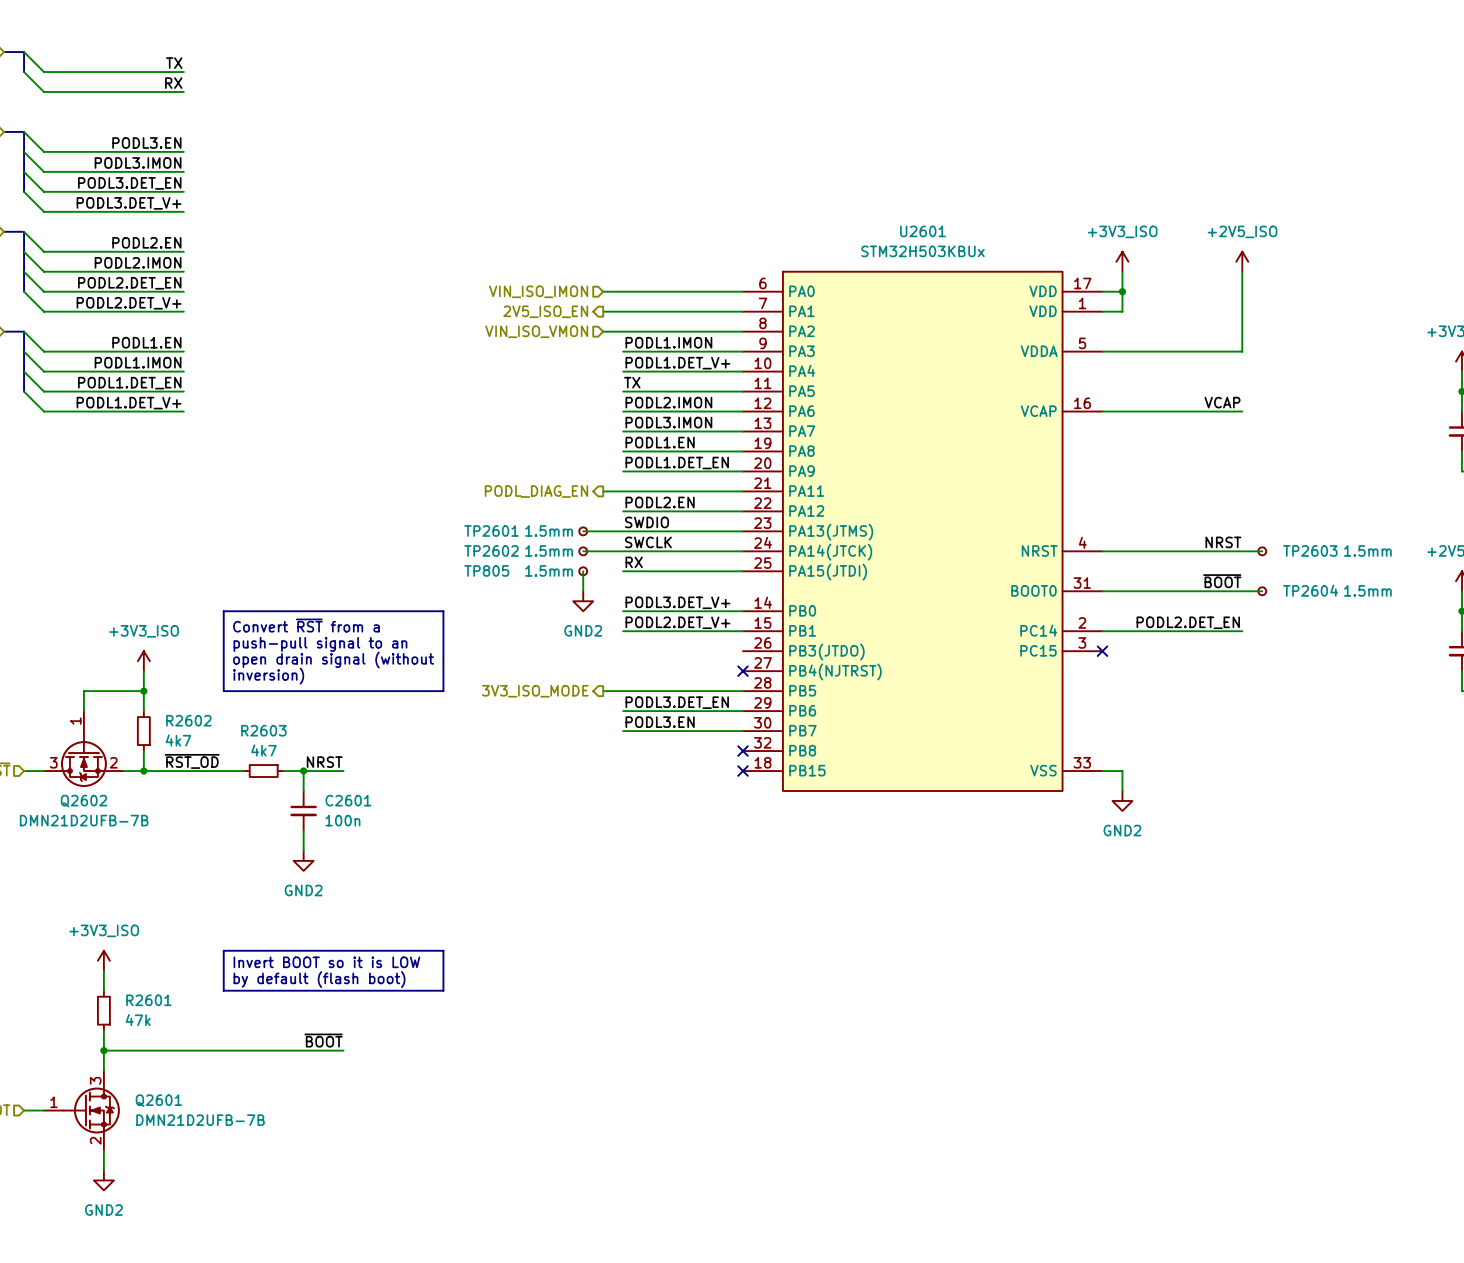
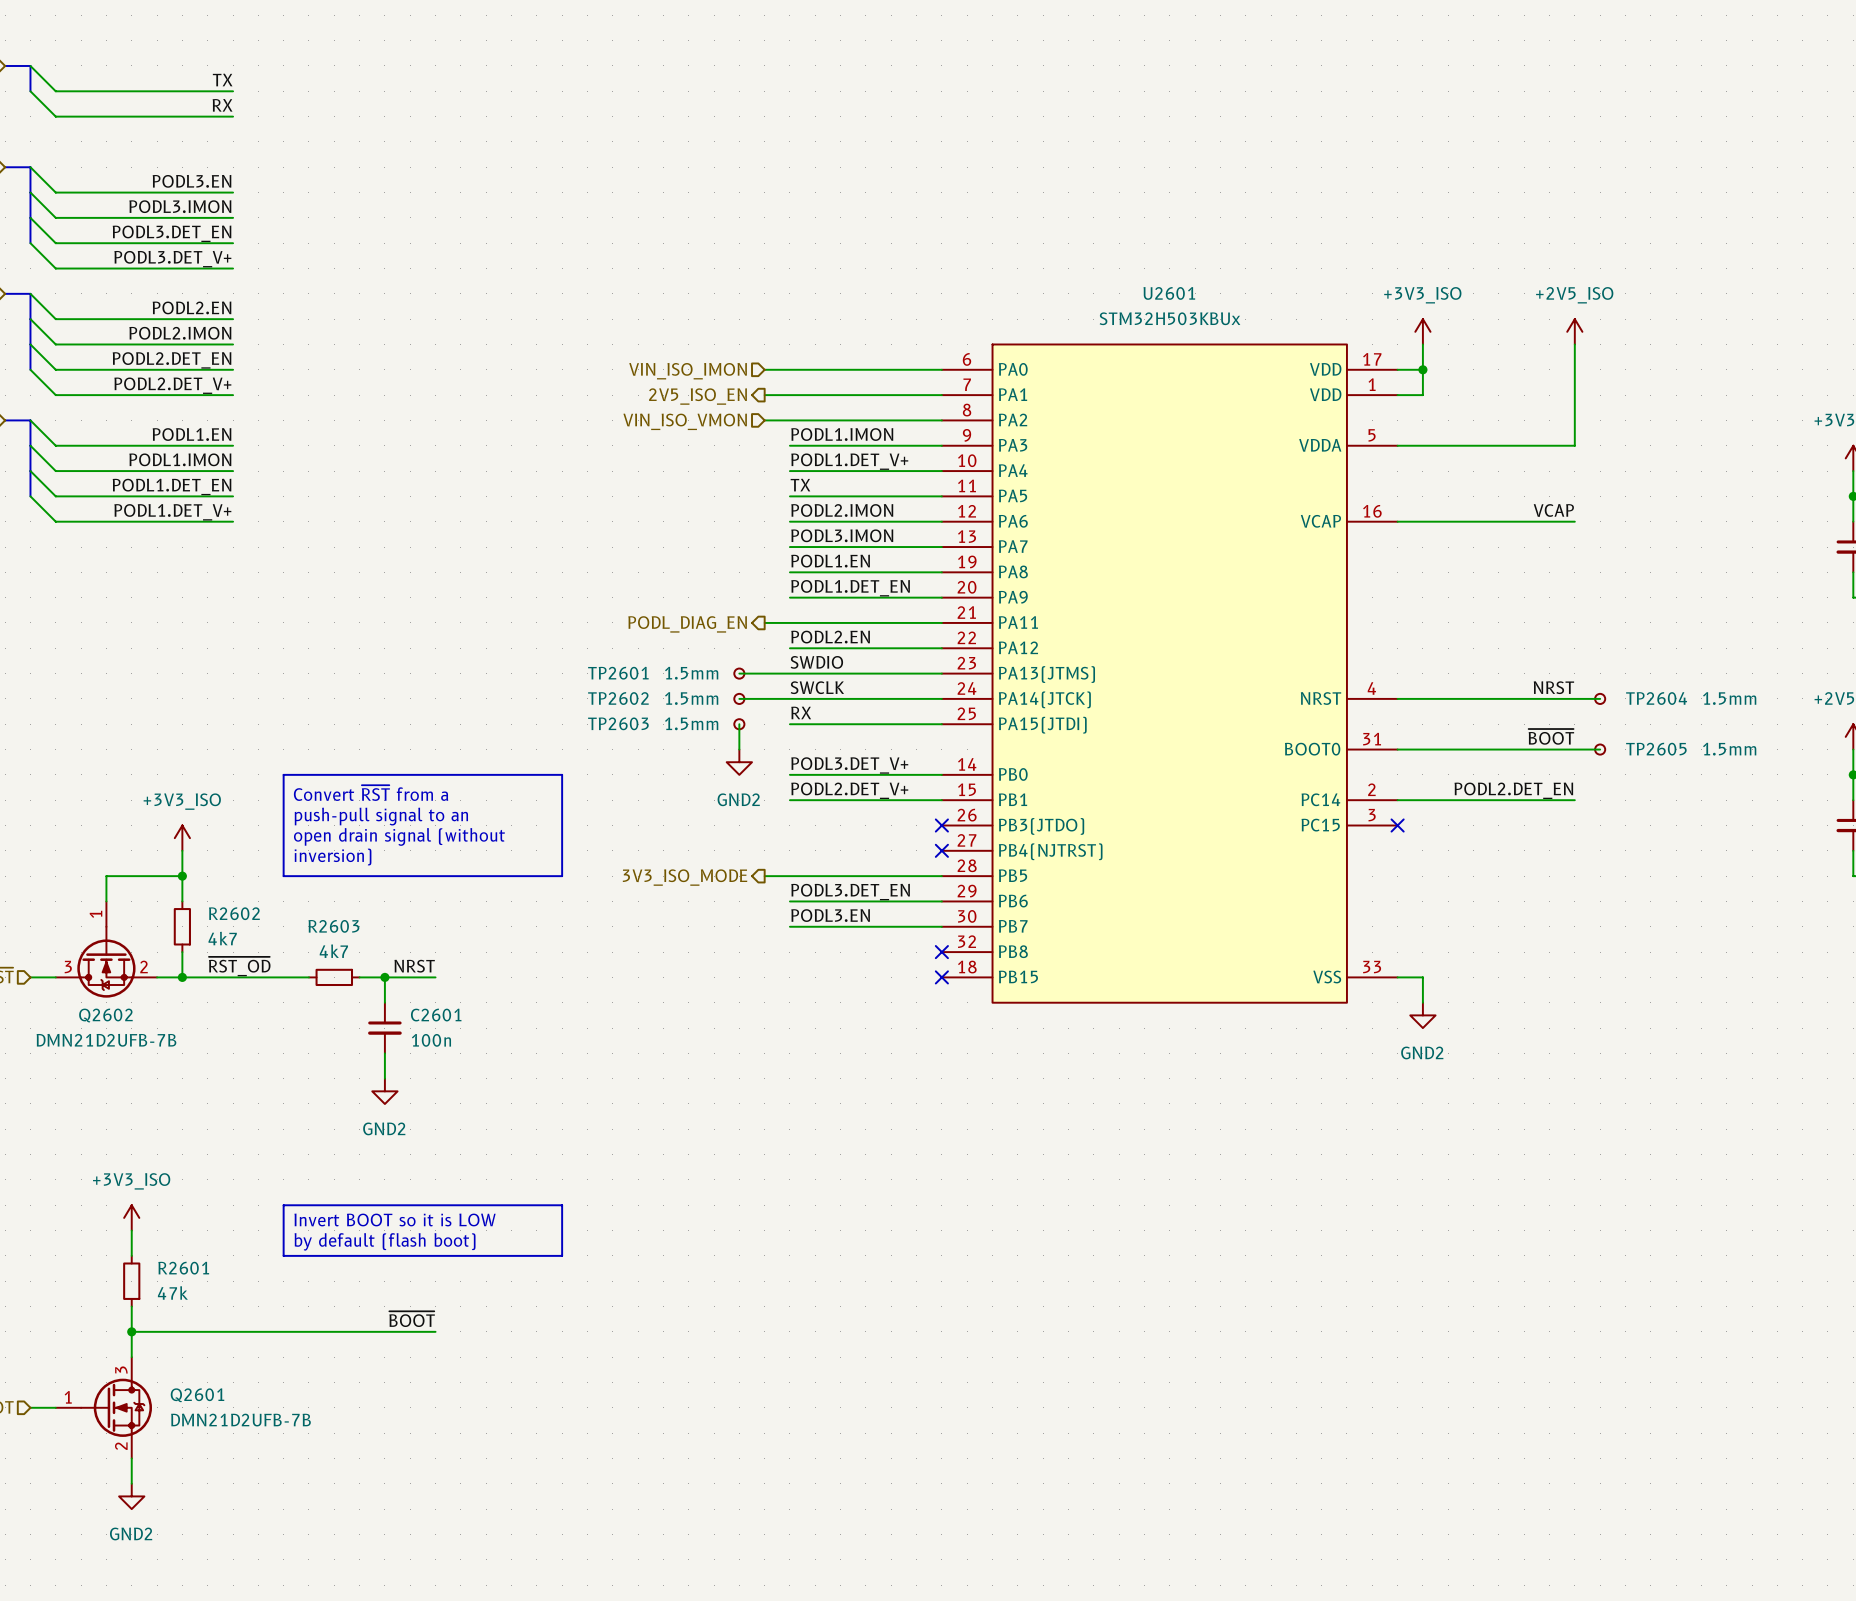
TP2603 name: TP2603 (1310, 550) -> TP2604 (1656, 698)
TP805 name: TP805 (486, 570) -> TP2603 (618, 723)
TP2604 name: TP2604 (1310, 590) -> TP2605 (1656, 749)
no-connect mark: none -> (941, 825)

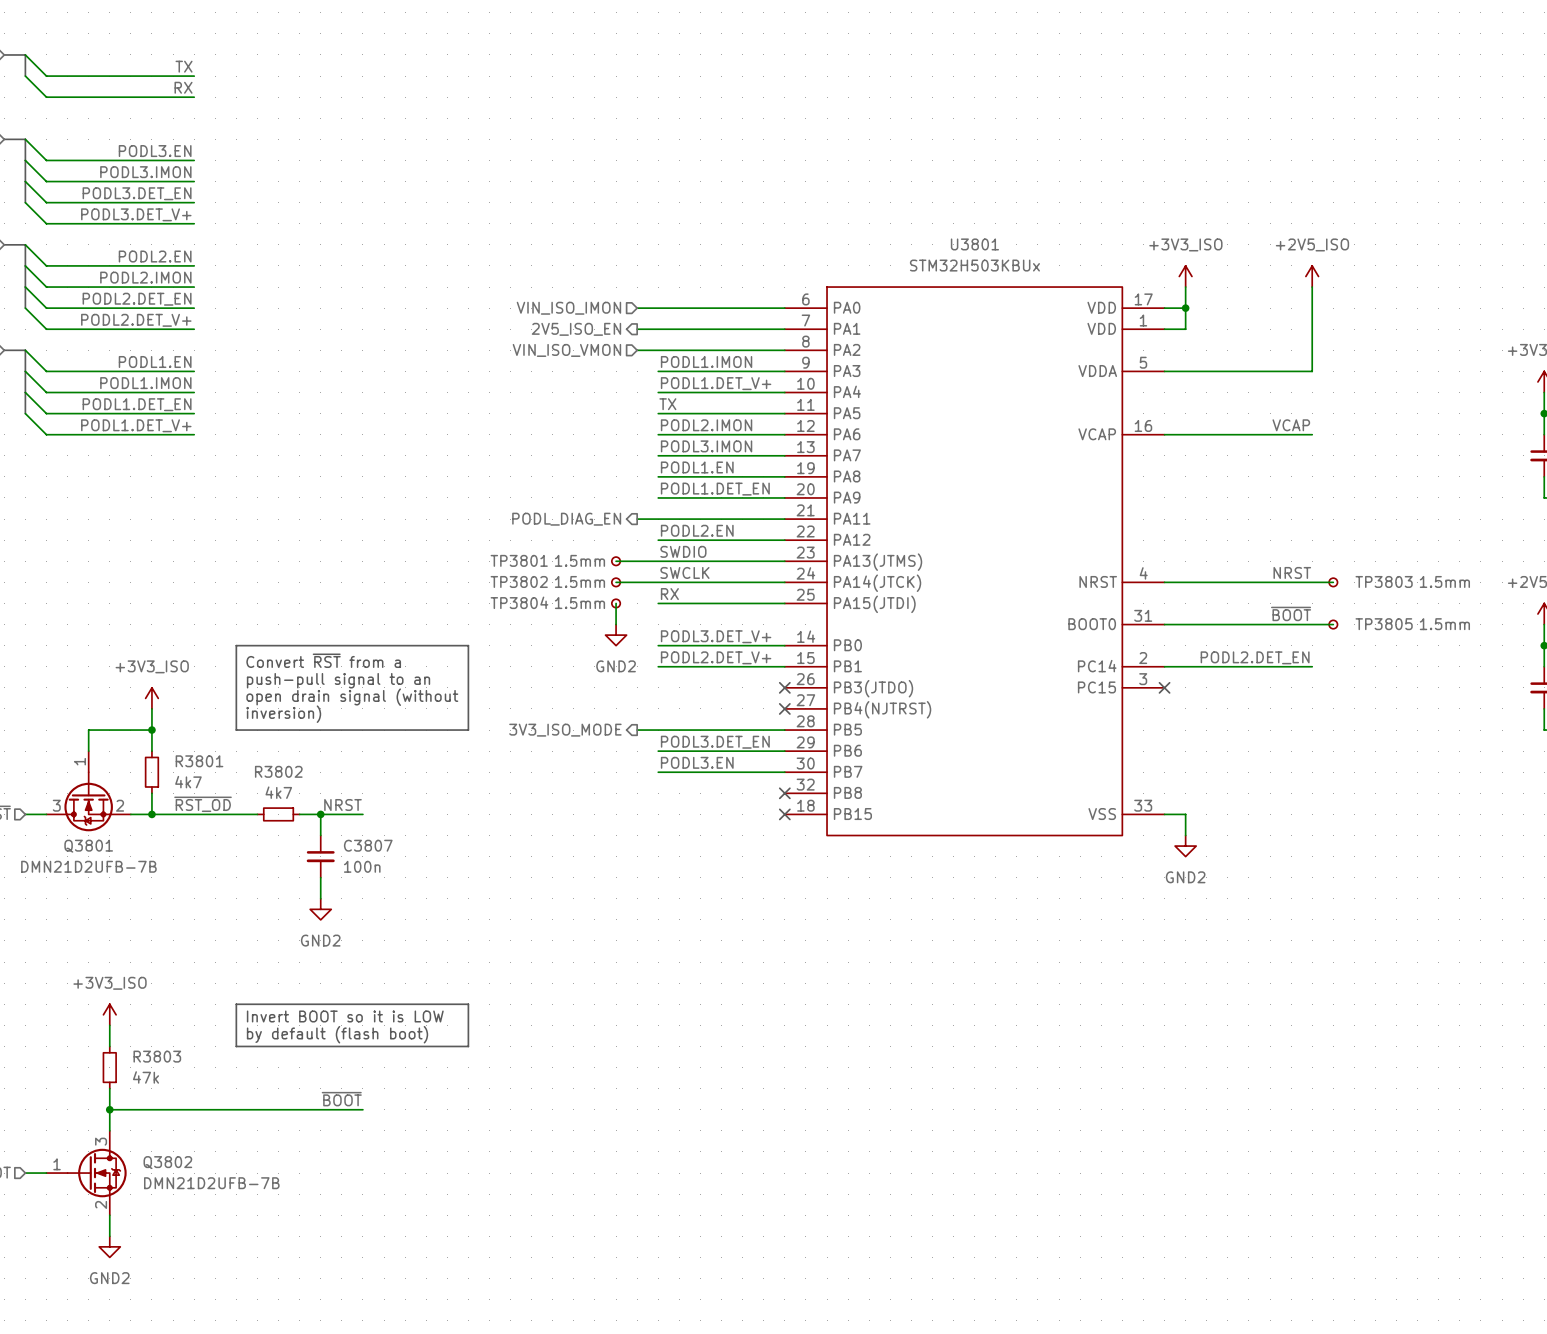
U2601 name: U2601 (1169, 293) -> U3801 (974, 244)
TP2601 name: TP2601 (618, 673) -> TP3801 (519, 560)
TP2602 name: TP2602 (618, 698) -> TP3802 (519, 581)
TP2604 name: TP2604 (1656, 698) -> TP3803 (1384, 581)
TP2603 name: TP2603 (618, 723) -> TP3804 (519, 602)
TP2605 name: TP2605 (1656, 749) -> TP3805 (1384, 624)
R2602 name: R2602 (234, 913) -> R3801 (199, 761)
R2603 name: R2603 (333, 926) -> R3802 (278, 771)
Q2602 name: Q2602 (105, 1015) -> Q3801 (88, 846)
C2601 name: C2601 (436, 1015) -> C3807 (368, 845)
R2601 name: R2601 (183, 1268) -> R3803 (157, 1056)
Q2601 name: Q2601 (197, 1395) -> Q3802 (167, 1162)

